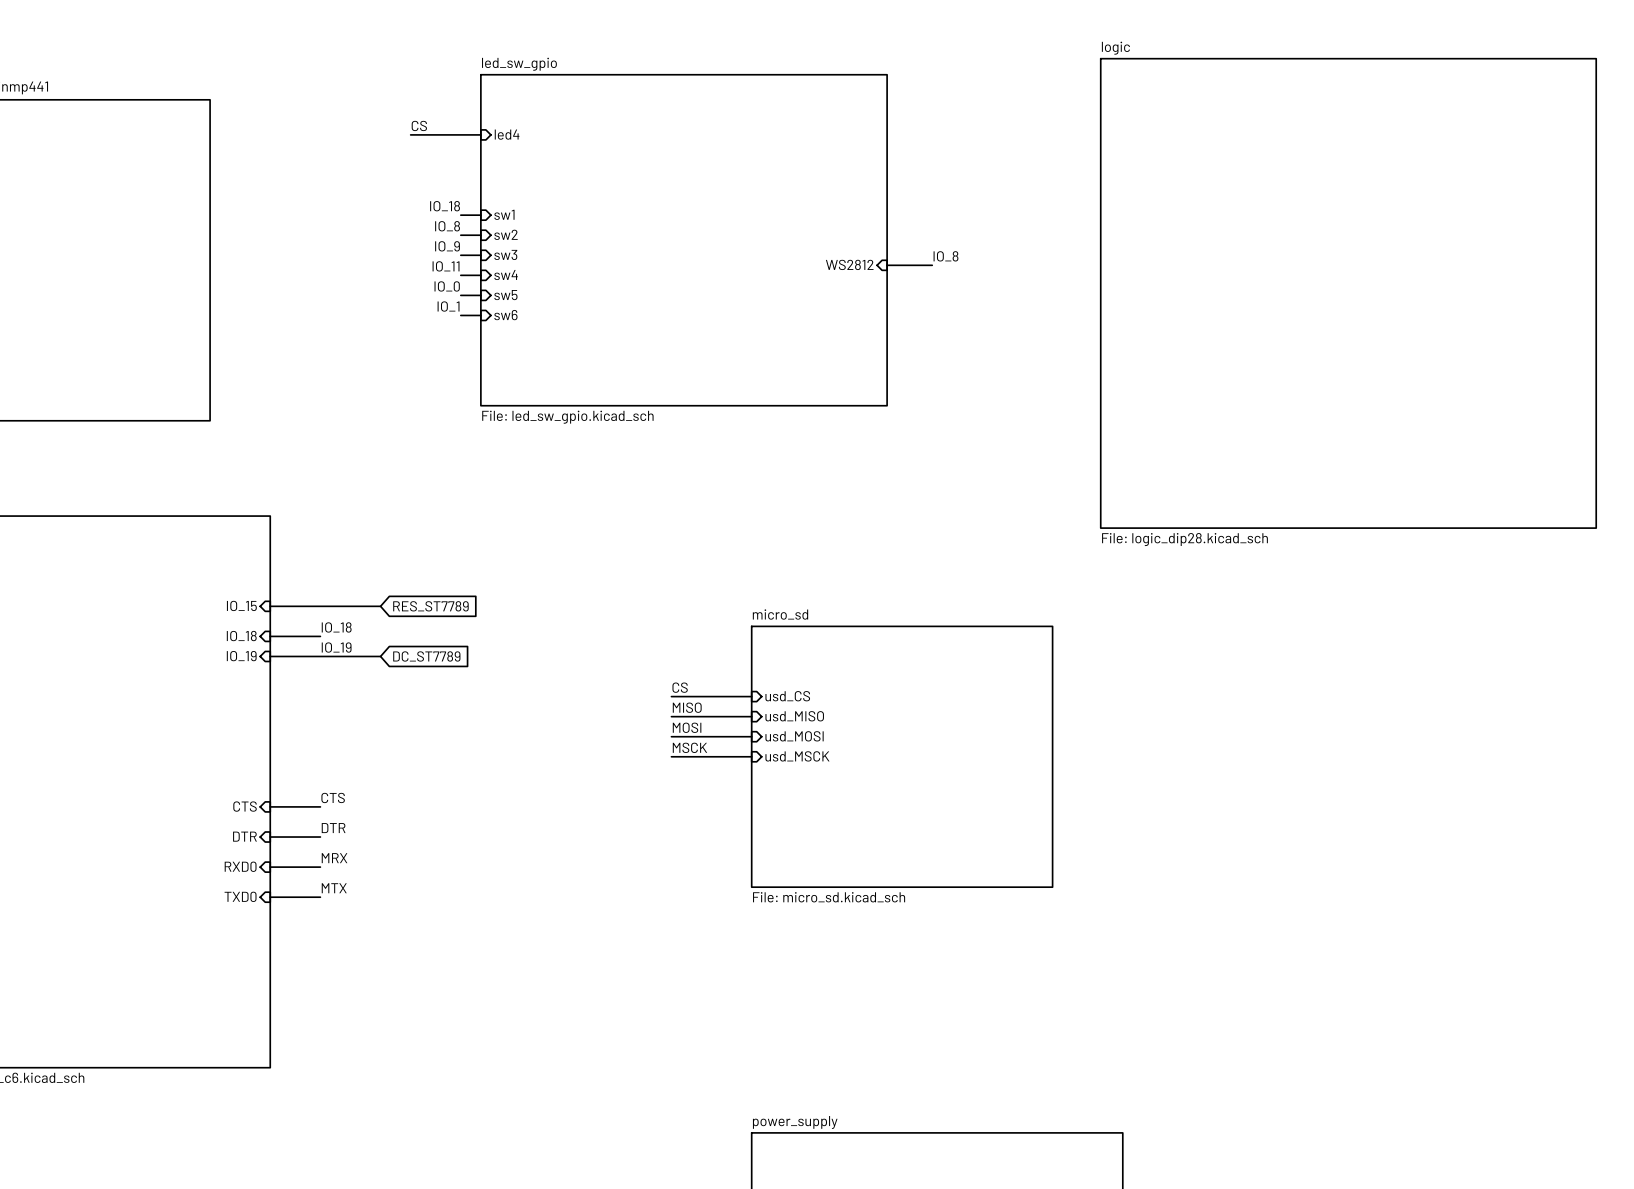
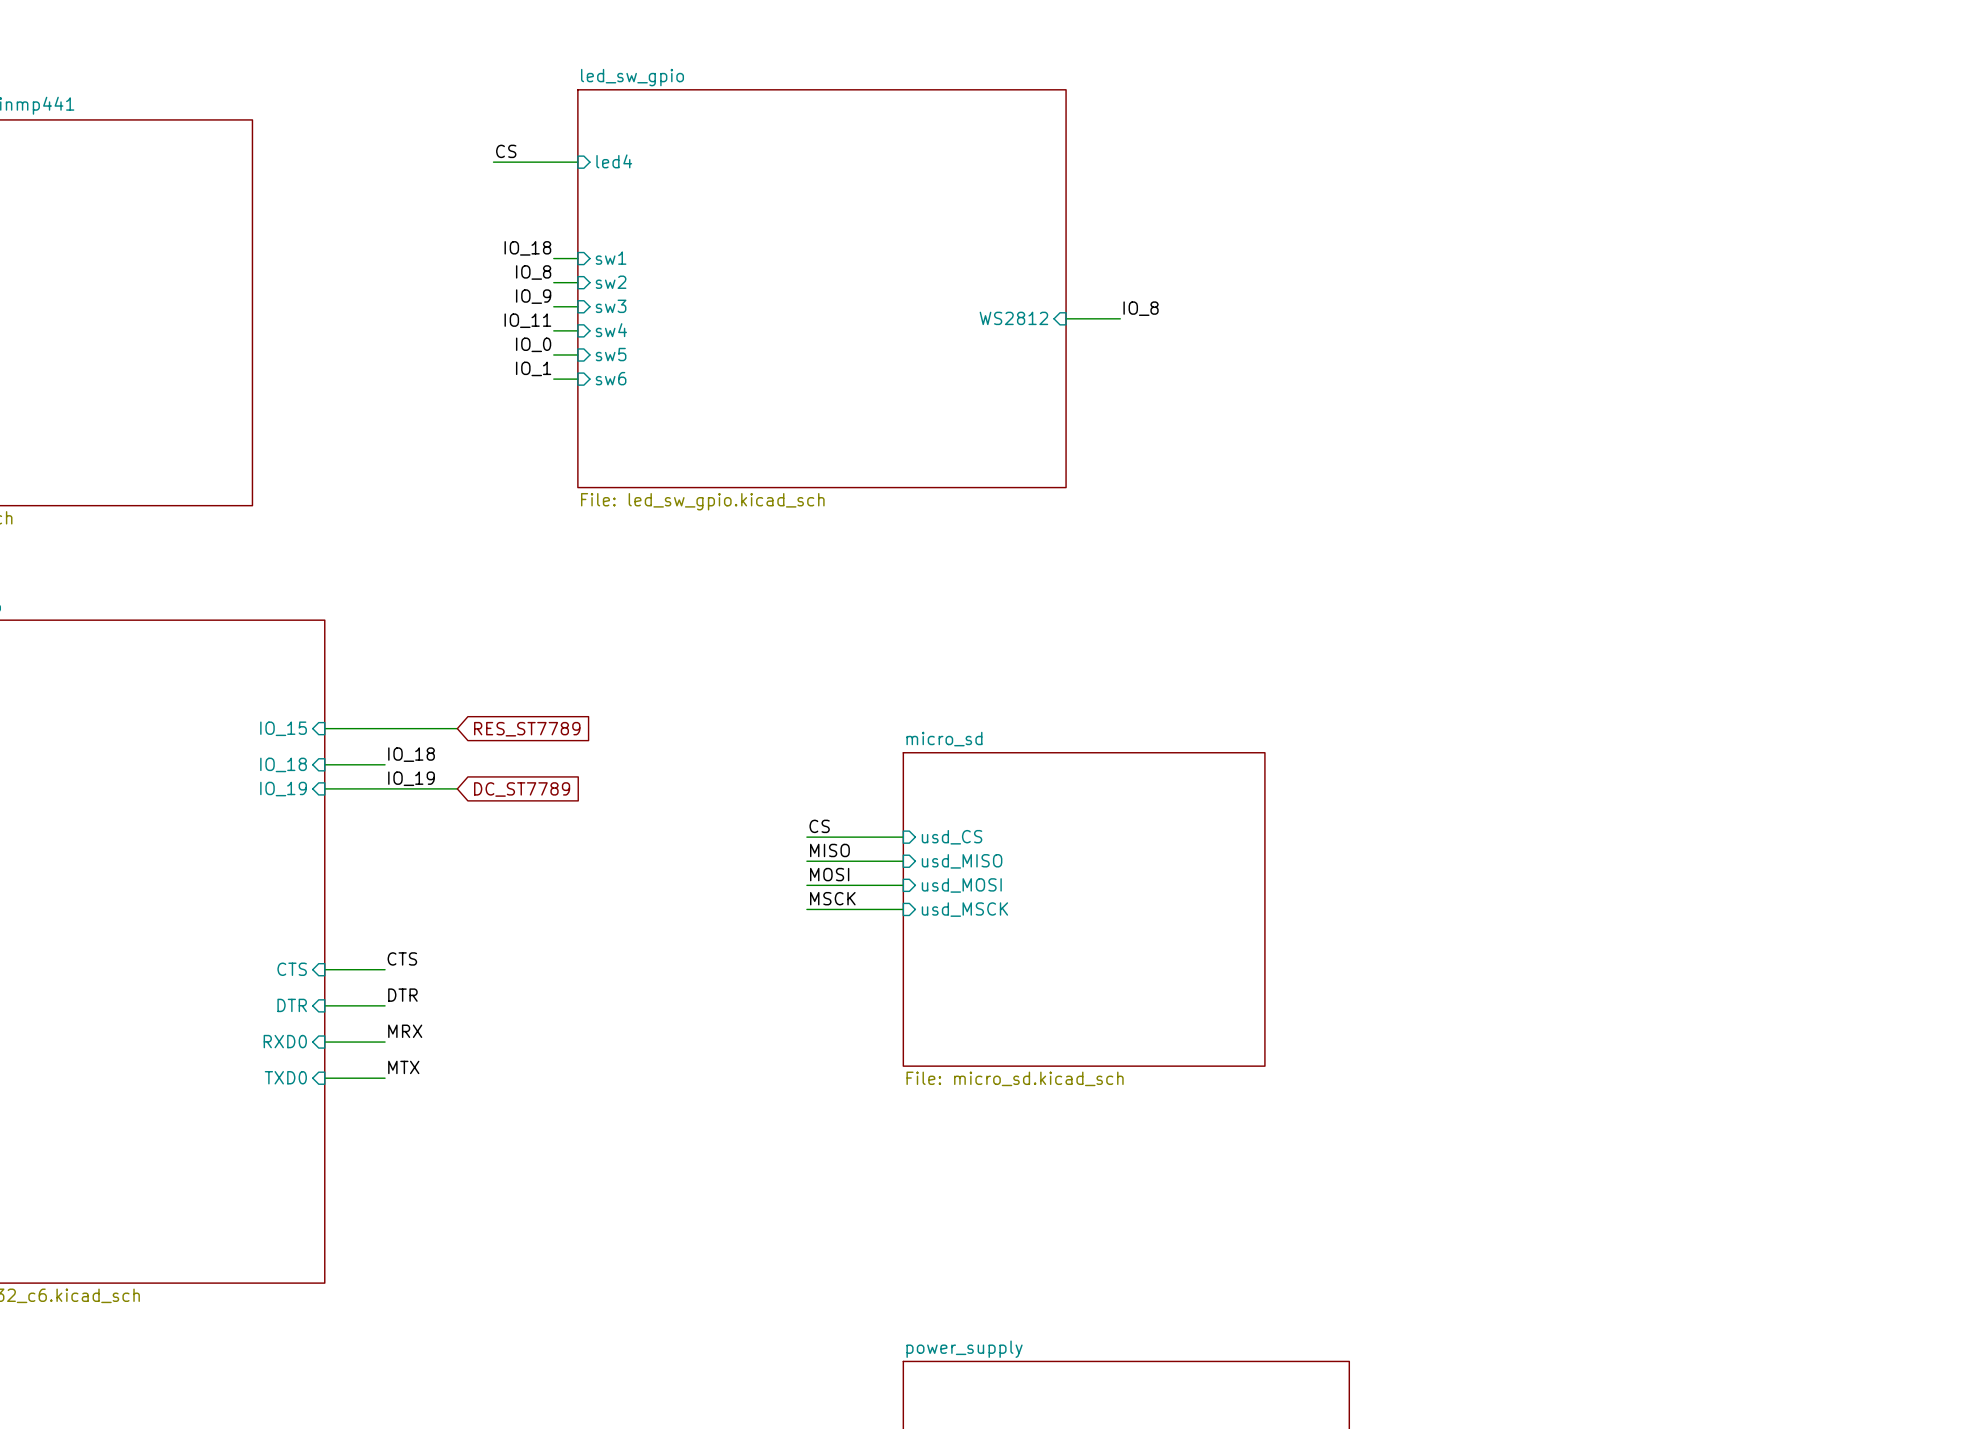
sheet logic: File: logic_dip28.kicad_sch (1348, 293) -> none

